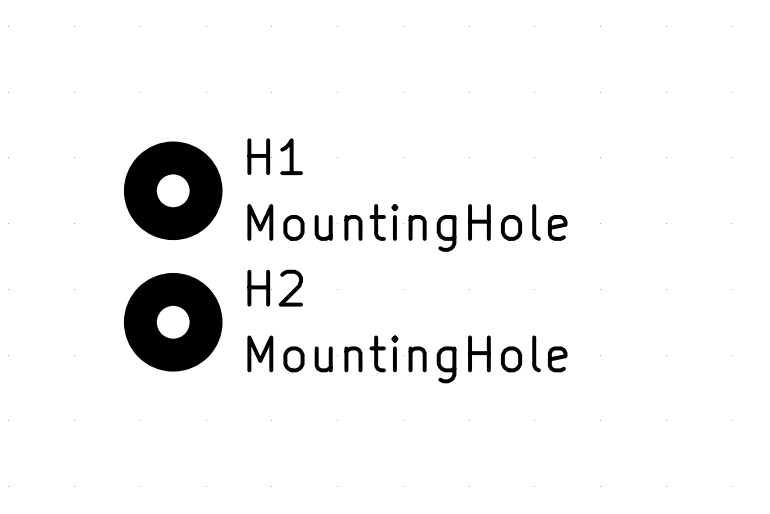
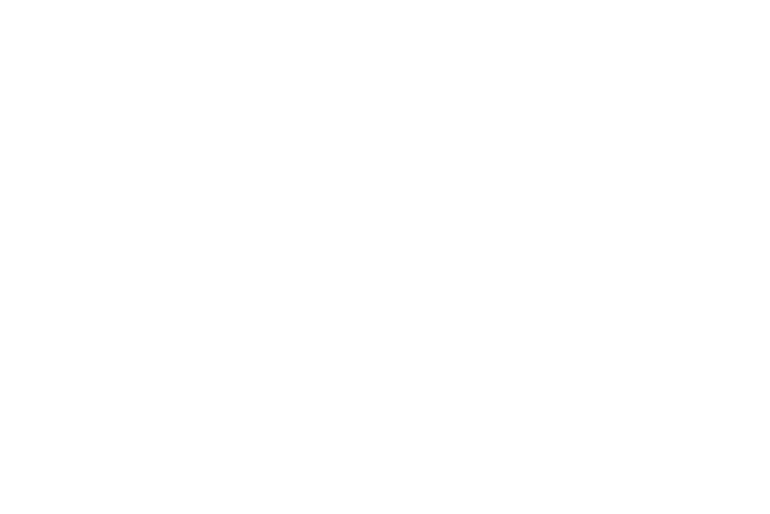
H1: MountingHole (173, 190) -> none
H2: MountingHole (173, 322) -> none

